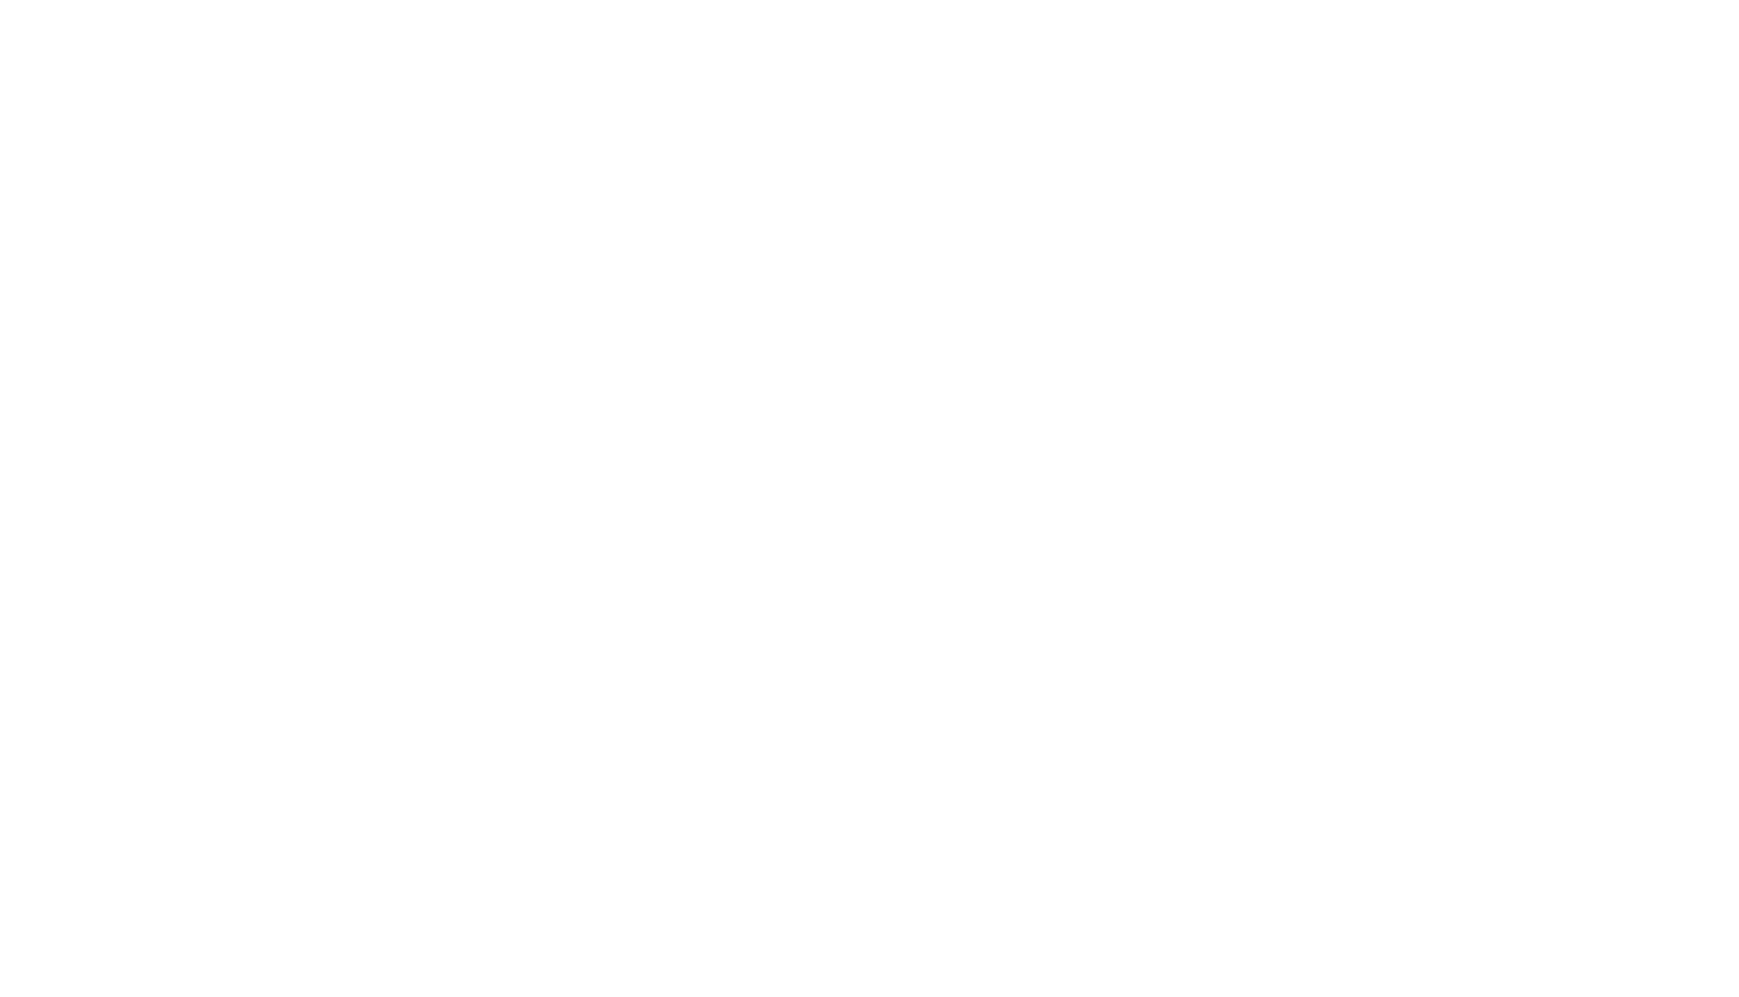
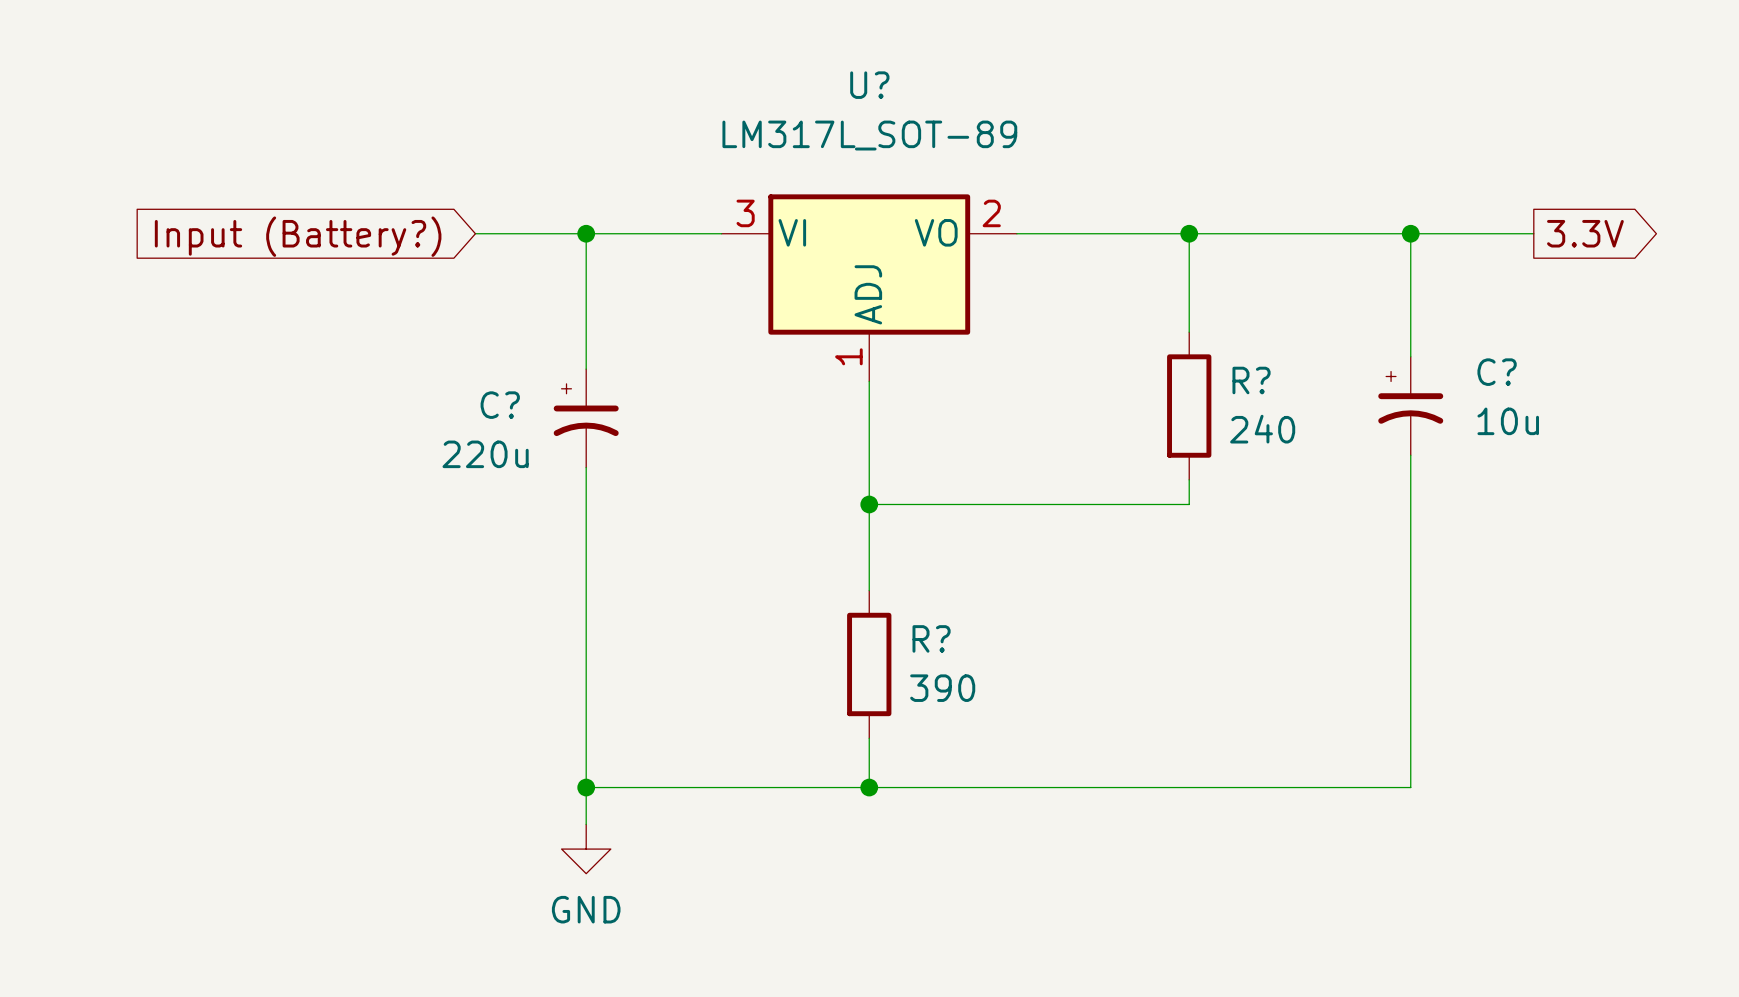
wire: none -> (475, 233) (721, 233)
wire: none -> (586, 233) (586, 369)
junction: none -> (586, 233)
wire: none -> (1016, 233) (1533, 233)
wire: none -> (1189, 233) (1189, 332)
junction: none -> (1189, 233)
wire: none -> (1410, 233) (1410, 356)
junction: none -> (1410, 233)
global label: none -> 3.3V (1585, 233)
global label: none -> Input (Battery?) (298, 236)
U?: none -> LM317L_SOT-89 (869, 287)
wire: none -> (869, 381) (869, 590)
R?: none -> 240 (1189, 406)
C?: none -> 10u (1410, 406)
C?: none -> 220u (586, 418)
wire: none -> (1410, 455) (1410, 787) (586, 787)
wire: none -> (586, 467) (586, 824)
wire: none -> (1189, 479) (1189, 504) (869, 504)
junction: none -> (869, 504)
R?: none -> 390 (869, 664)
wire: none -> (869, 738) (869, 787)
junction: none -> (586, 787)
junction: none -> (869, 787)
power symbol: none -> GND (586, 849)

